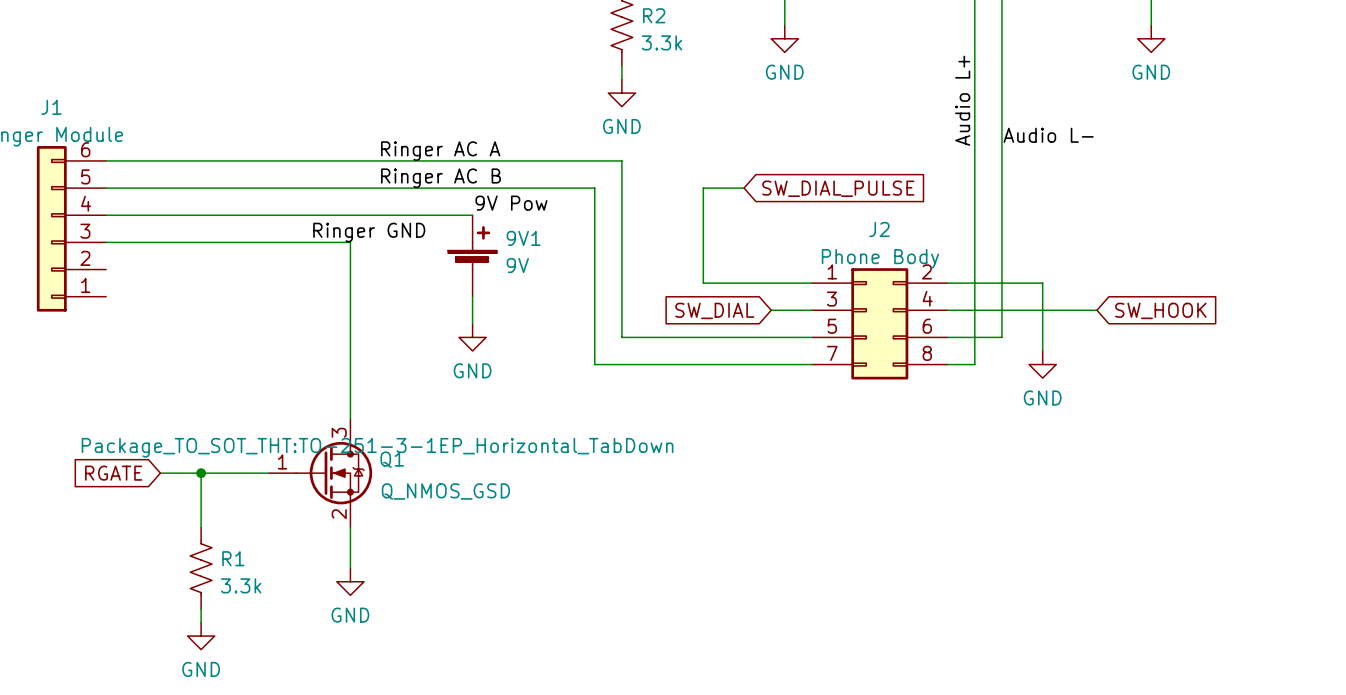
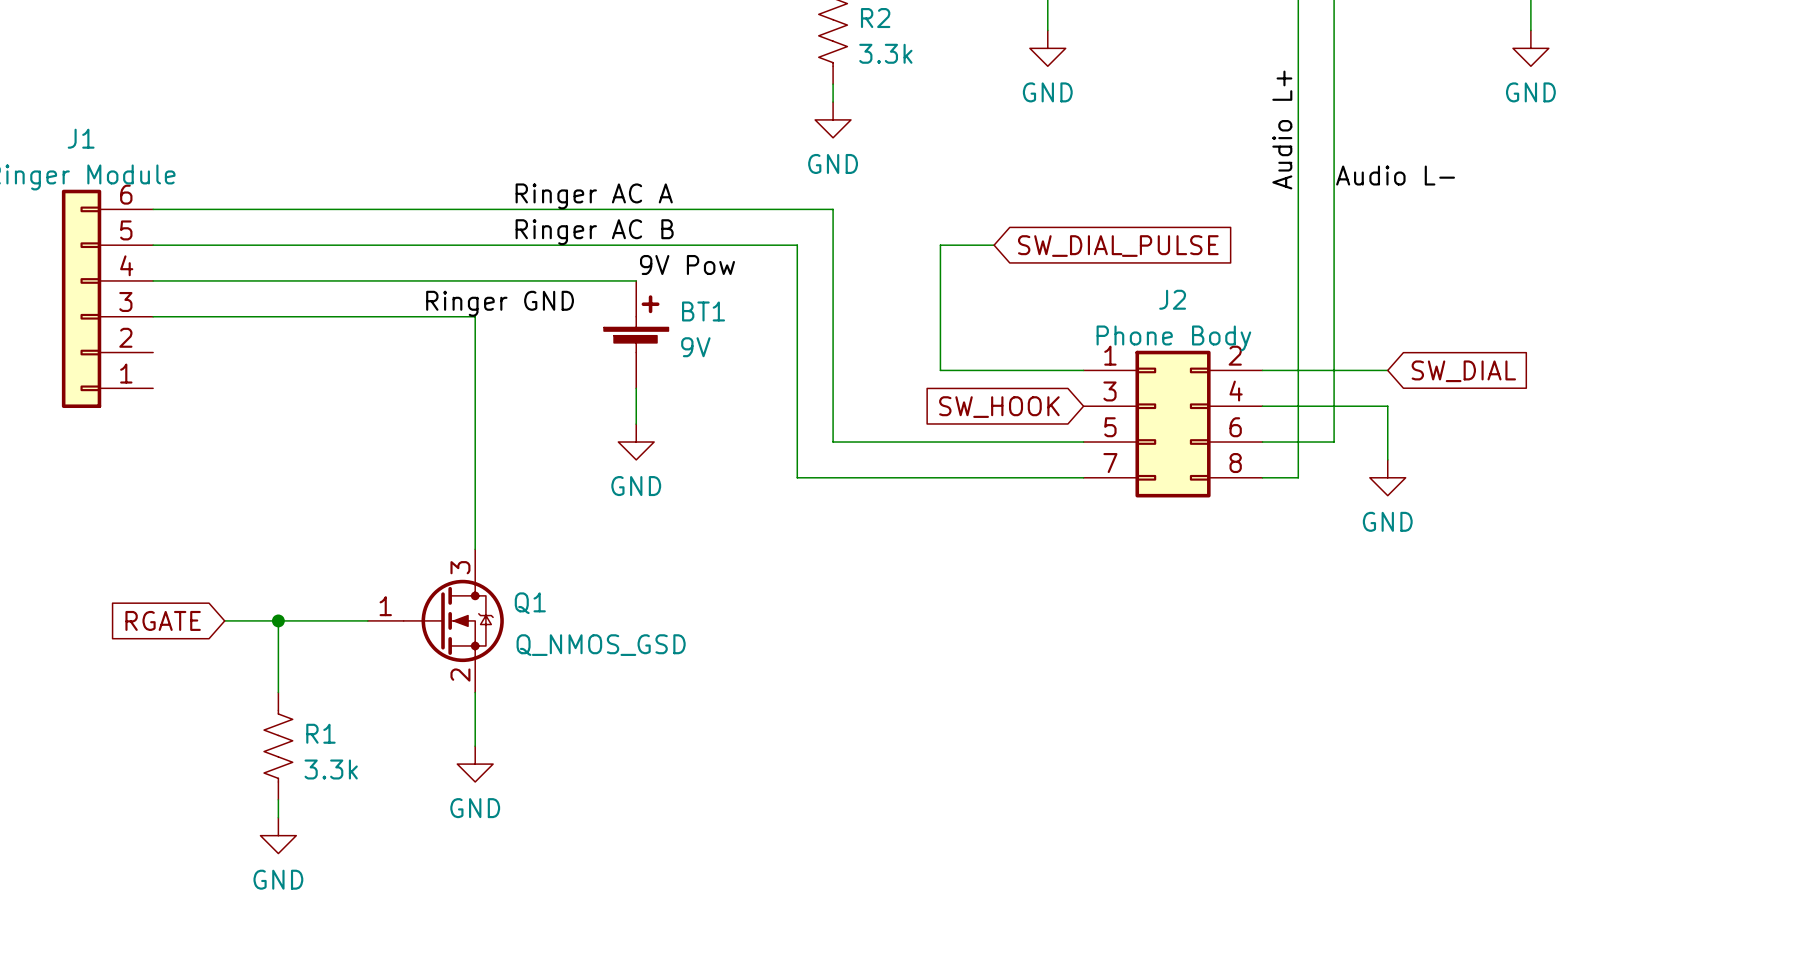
9V1 name: 9V1 (523, 238) -> BT1 (703, 311)
wire: (1042, 283) (1042, 310) (1096, 310) -> none
global label: none -> SW_DIAL (1463, 371)
global label: SW_DIAL (714, 310) -> none
global label: none -> SW_HOOK (999, 407)
wire: (771, 310) (811, 310) -> none
global label: SW_HOOK (1160, 310) -> none
Q1 text: Package_TO_SOT_THT:TO-251-3-1EP_Horizontal_TabDown (377, 447) -> none

